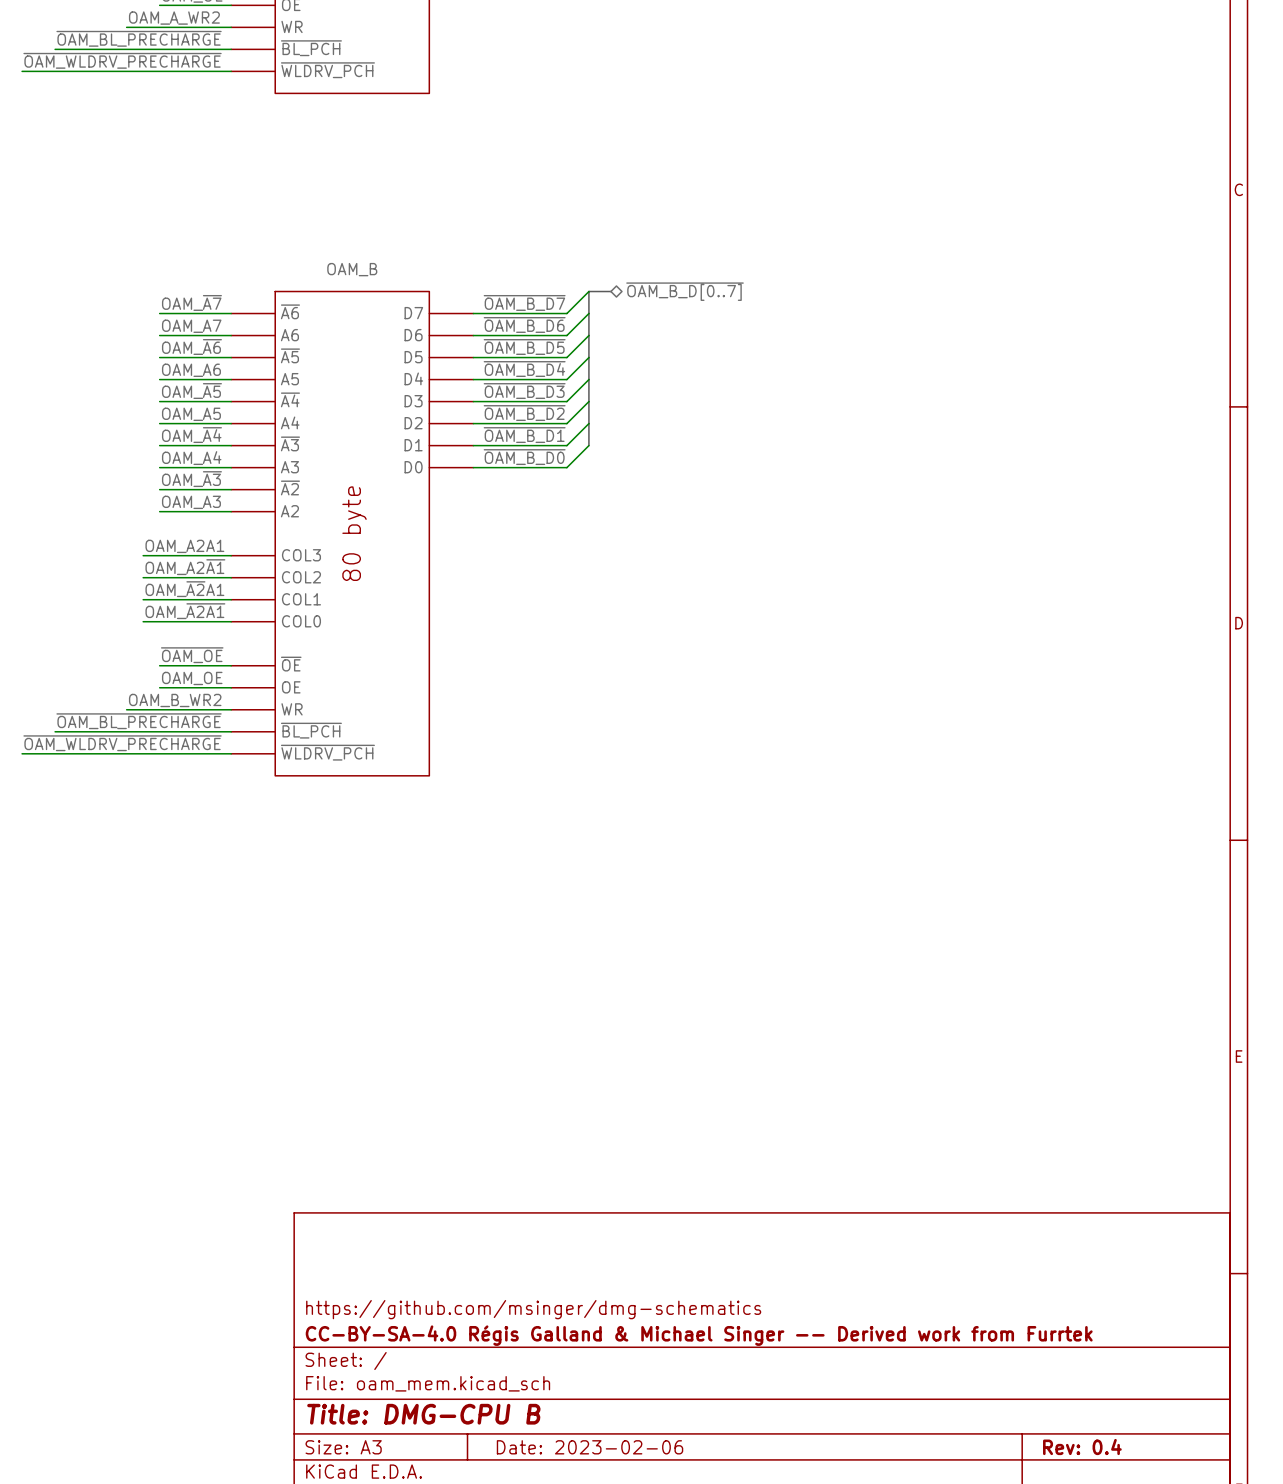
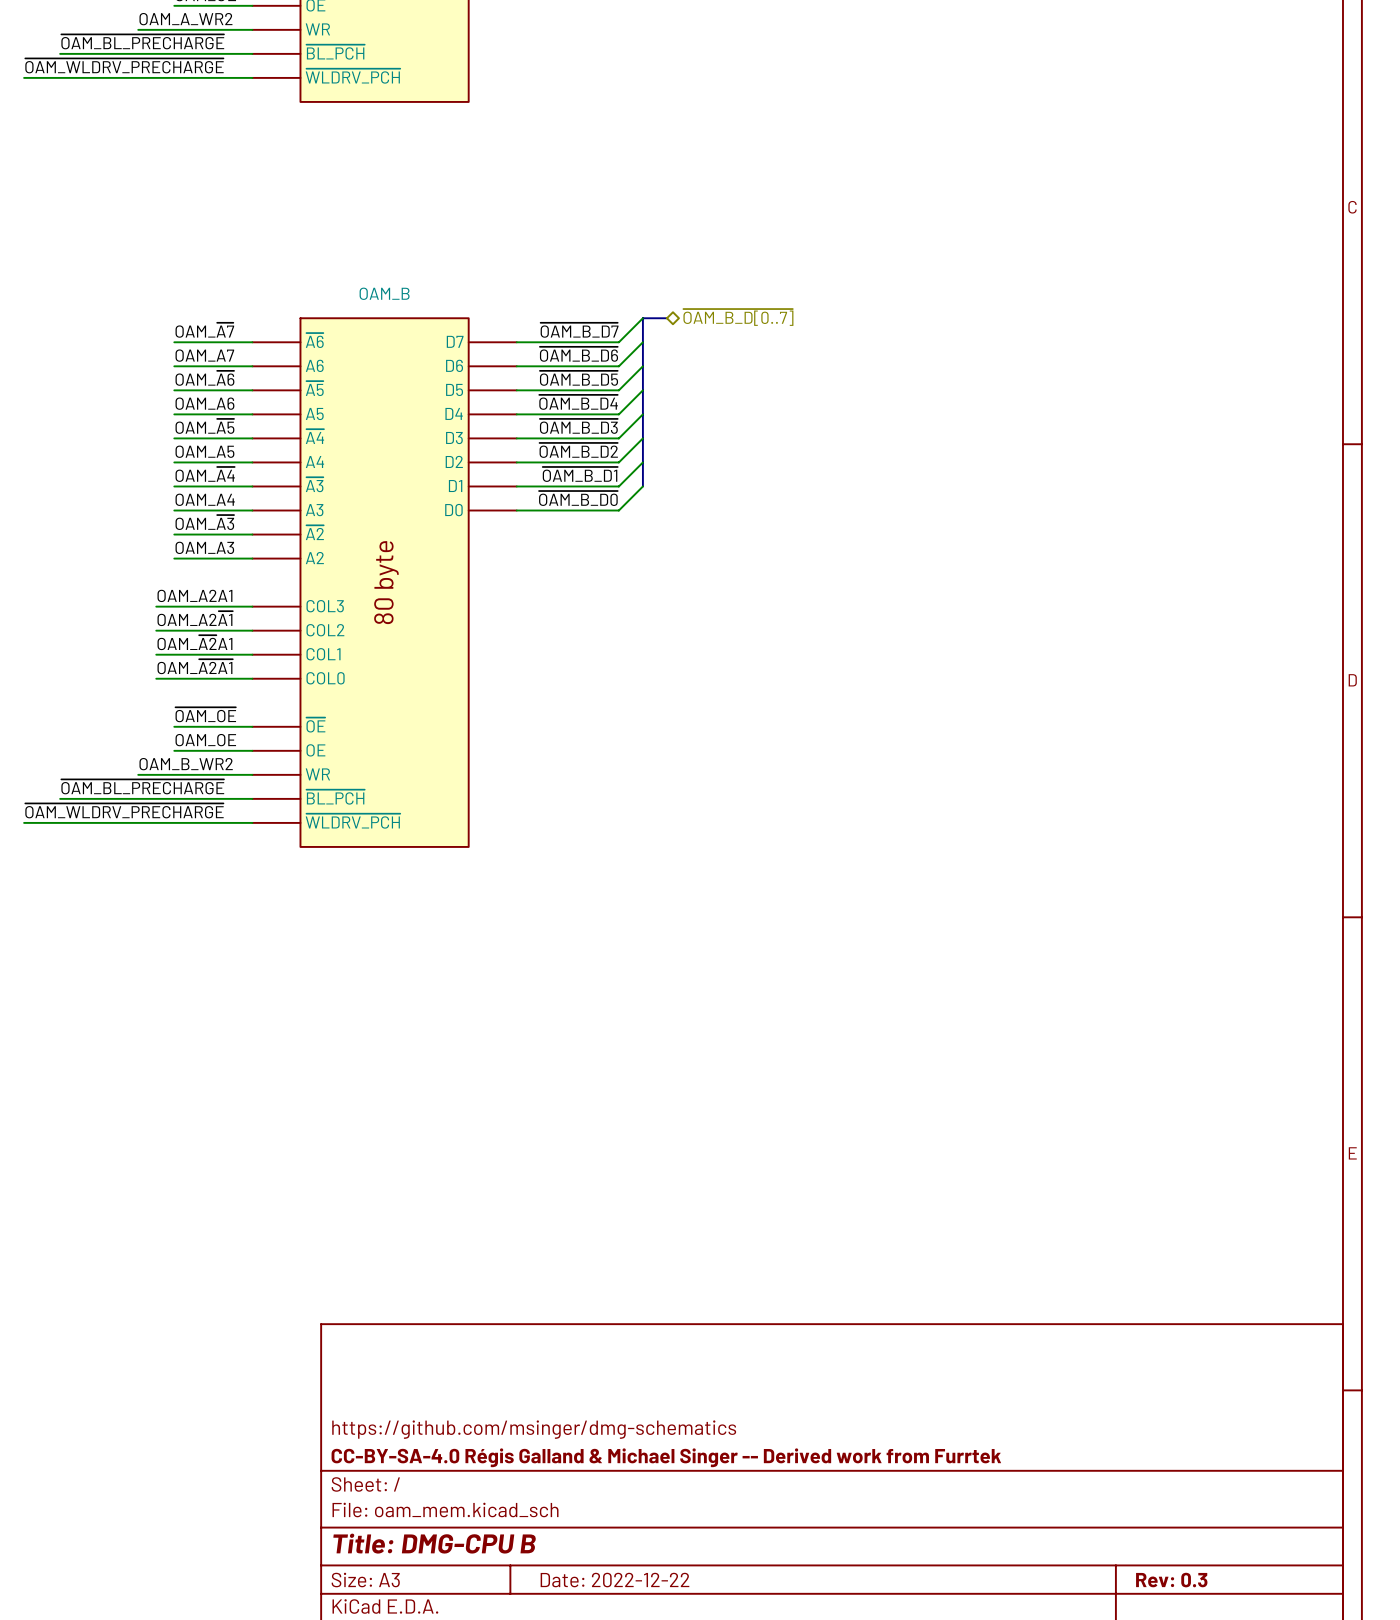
title block: Date: 2023-02-06 (590, 1447) -> Date: 2022-12-22 (614, 1580)
title block: Rev: 0.4 (1082, 1447) -> Rev: 0.3 (1171, 1580)

